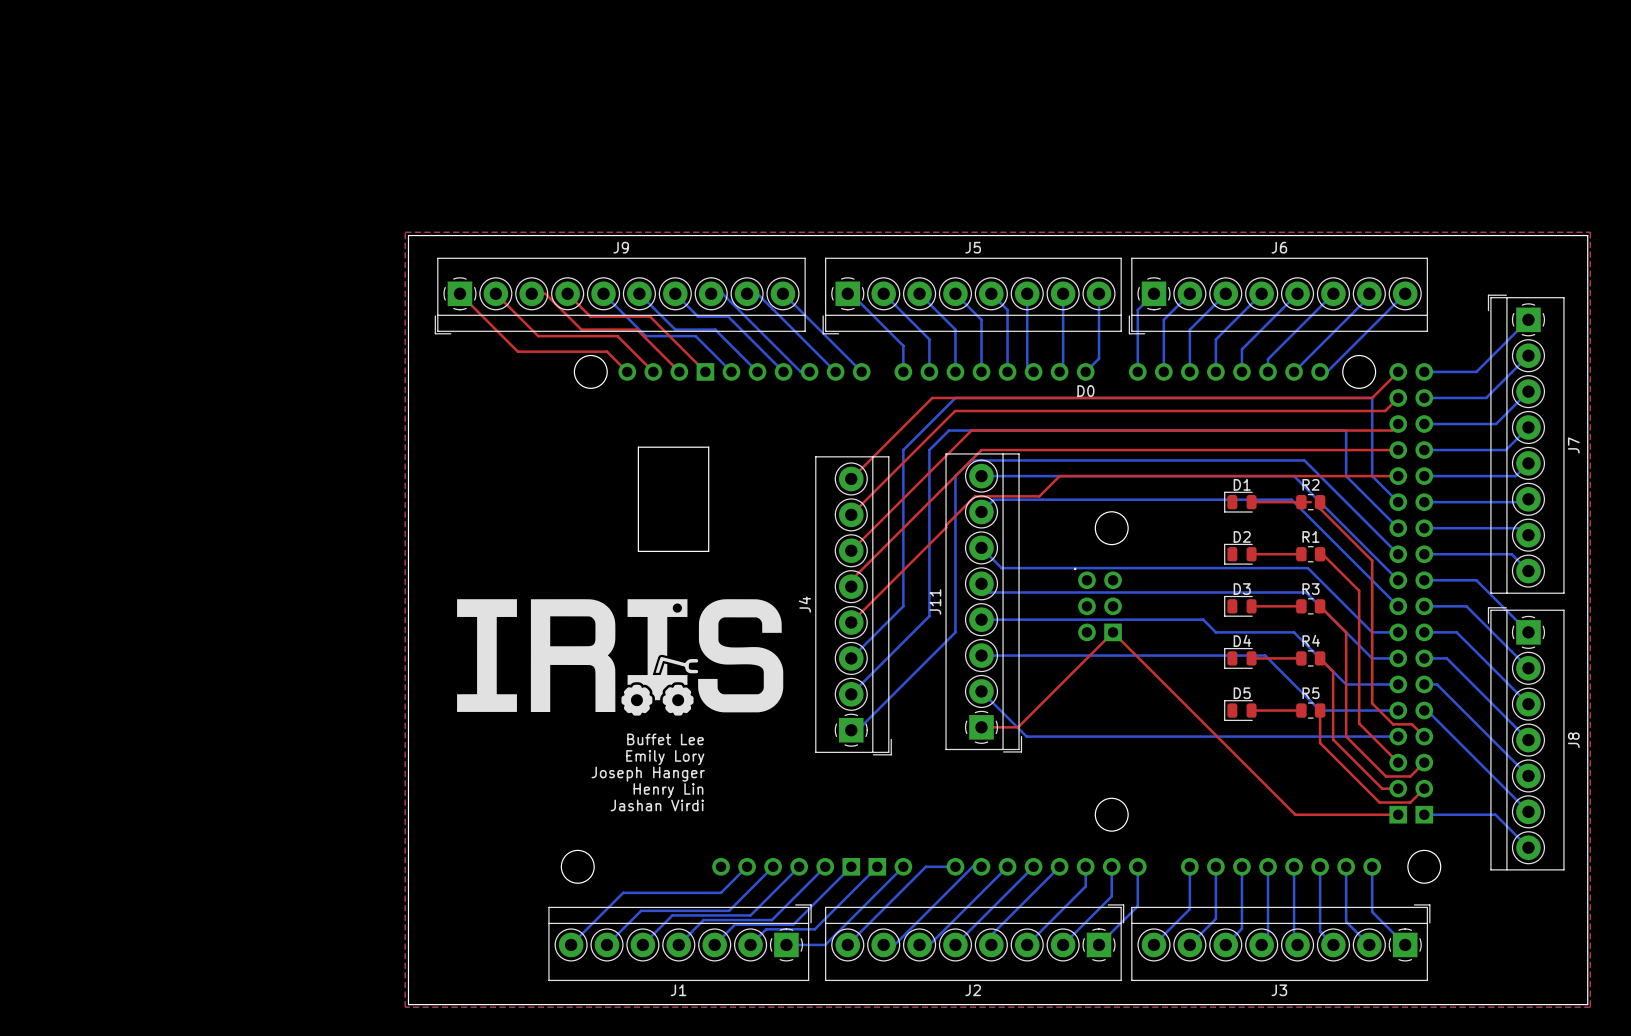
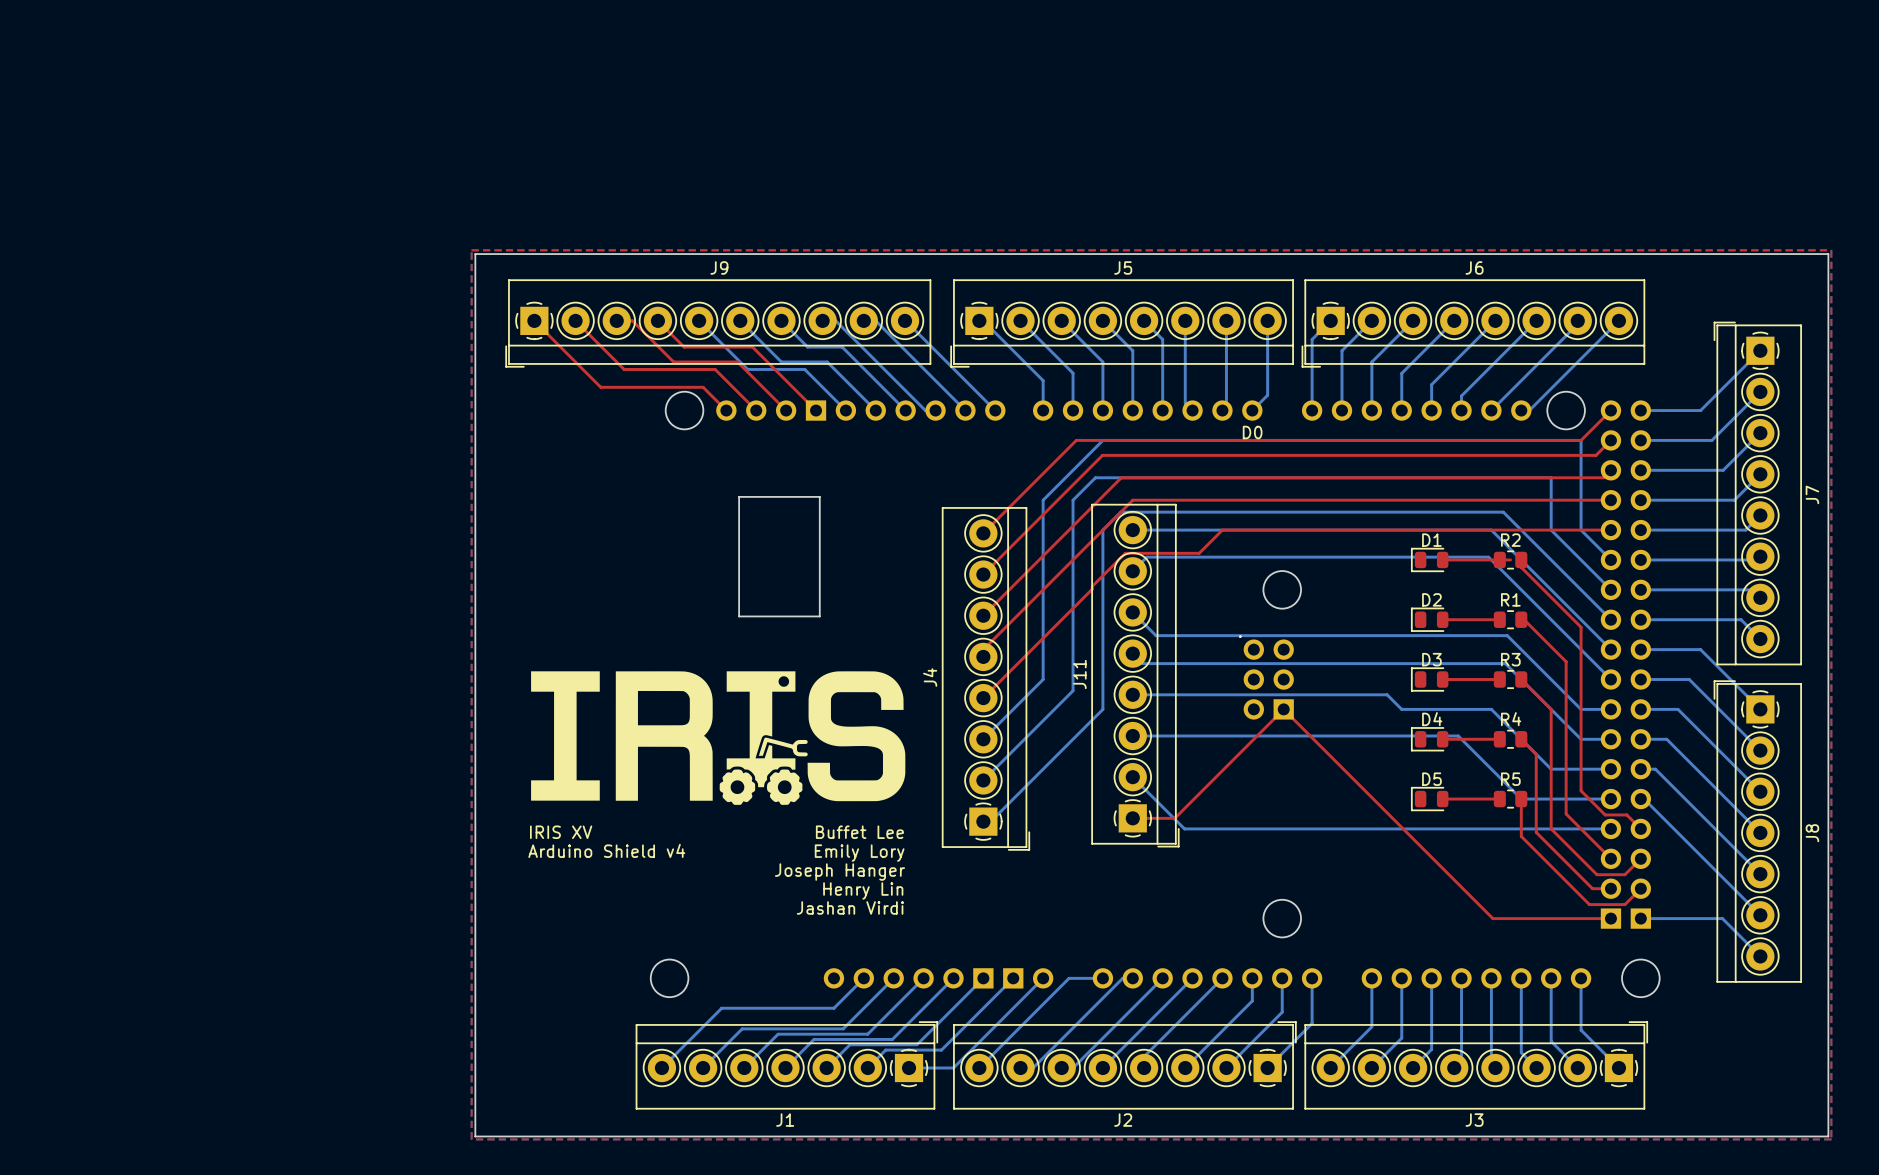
text: none -> IRIS XV (561, 832)
text position: Buffet Lee (665, 739) -> Buffet Lee (859, 832)
text: none -> Arduino Shield v4 (606, 850)
text position: Emily Lory (665, 757) -> Emily Lory (859, 853)
text position: Joseph Hanger (648, 774) -> Joseph Hanger (840, 872)
text position: Henry Lin (668, 790) -> Henry Lin (863, 890)
text position: Jashan Virdi (657, 805) -> Jashan Virdi (850, 907)

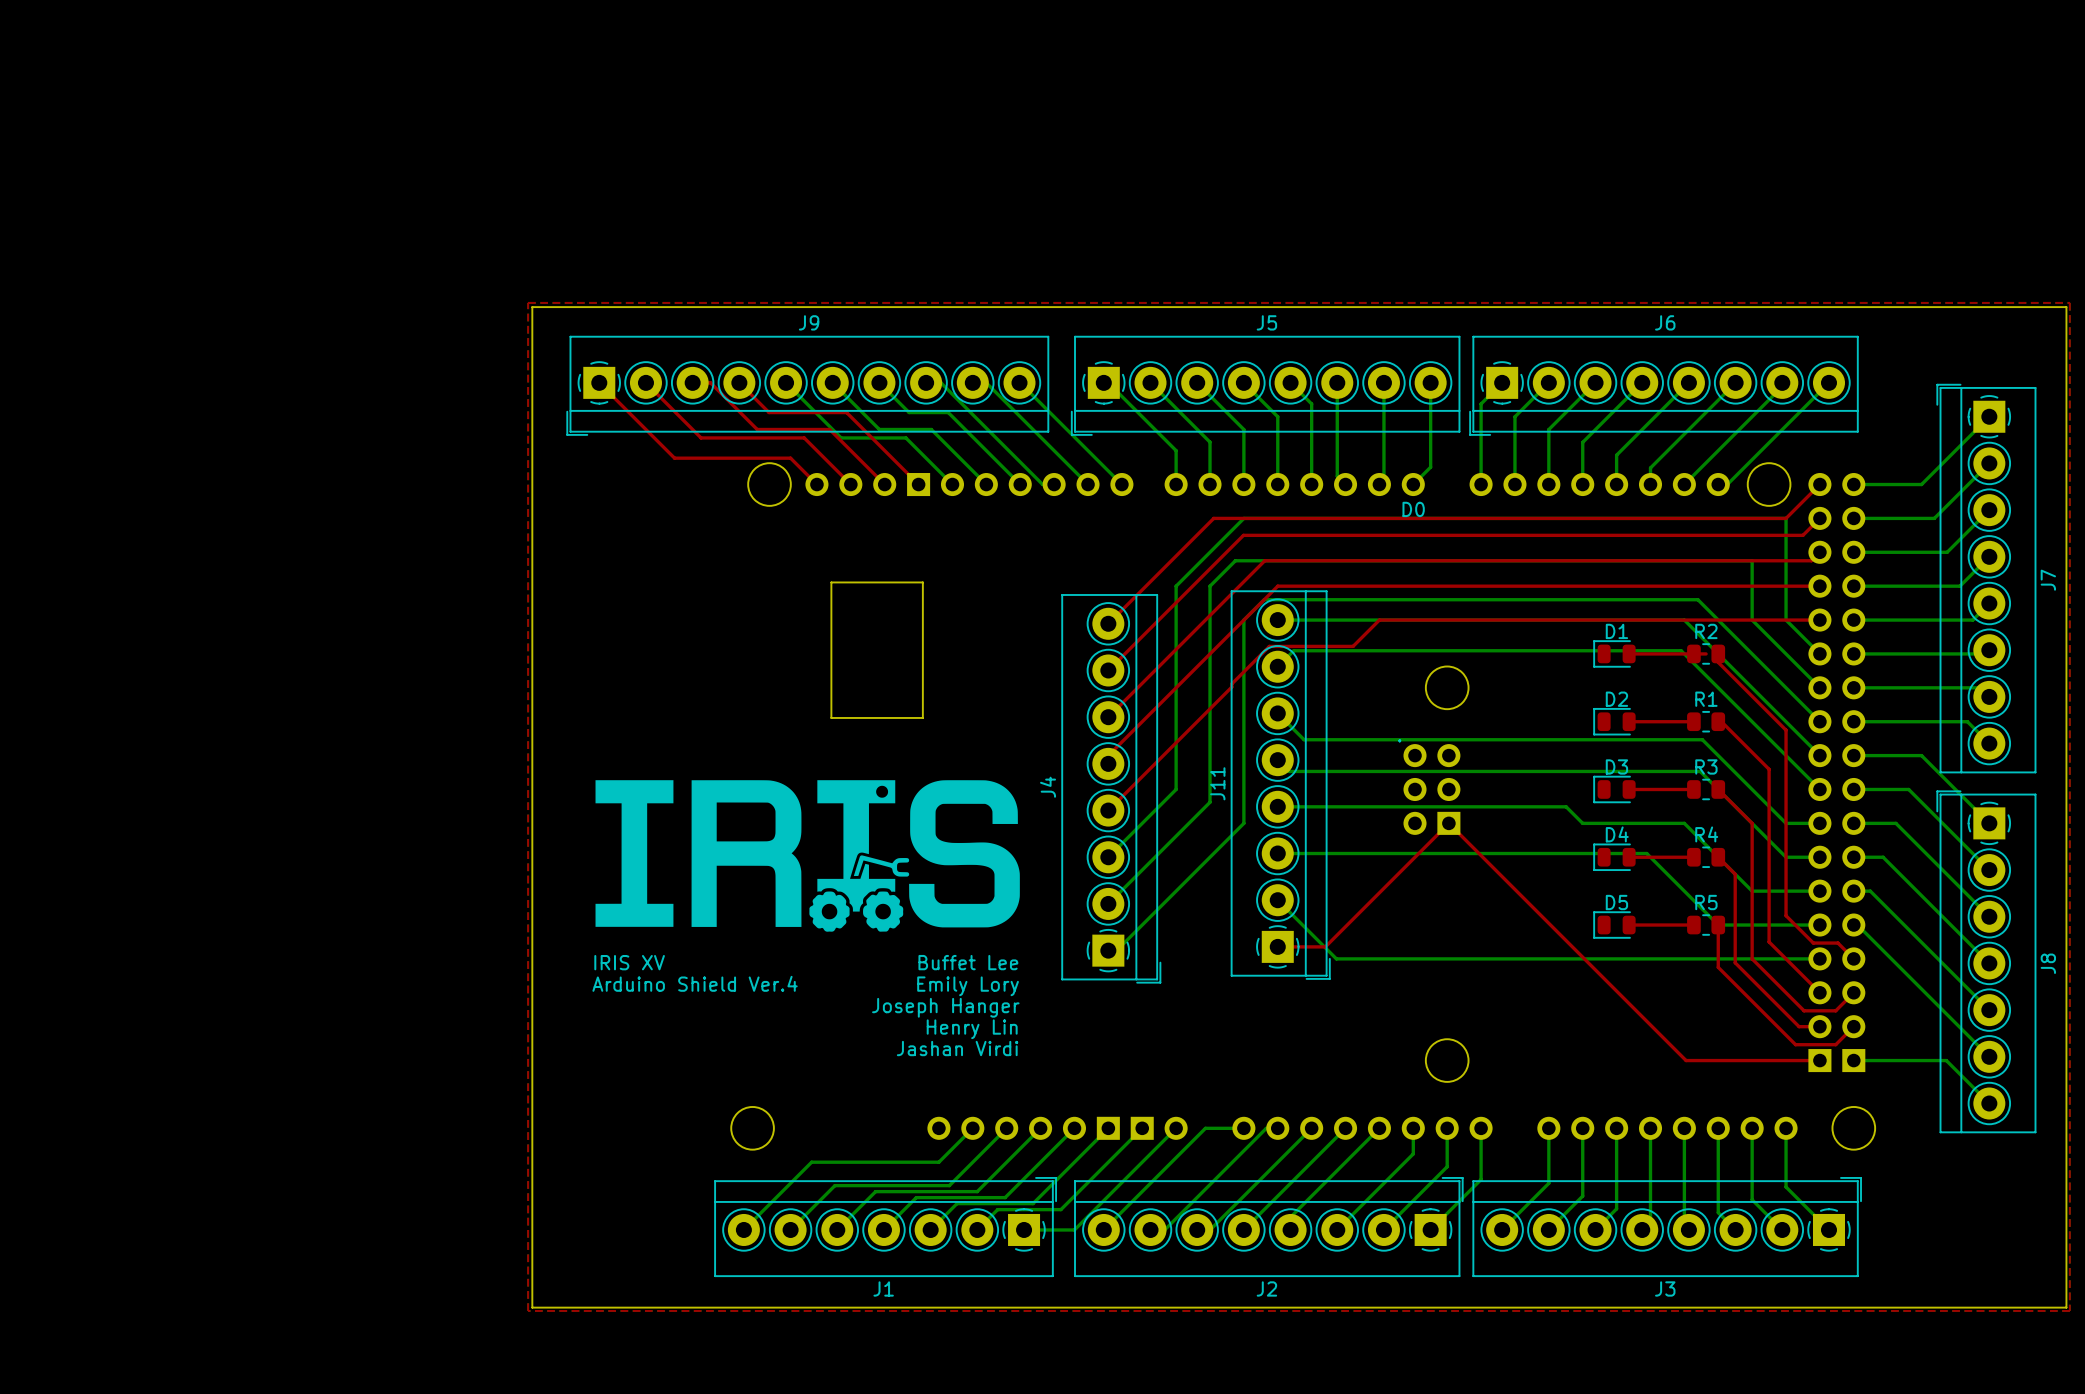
text: Arduino Shield v4 (606, 850) -> Arduino Shield Ver.4 (695, 983)

